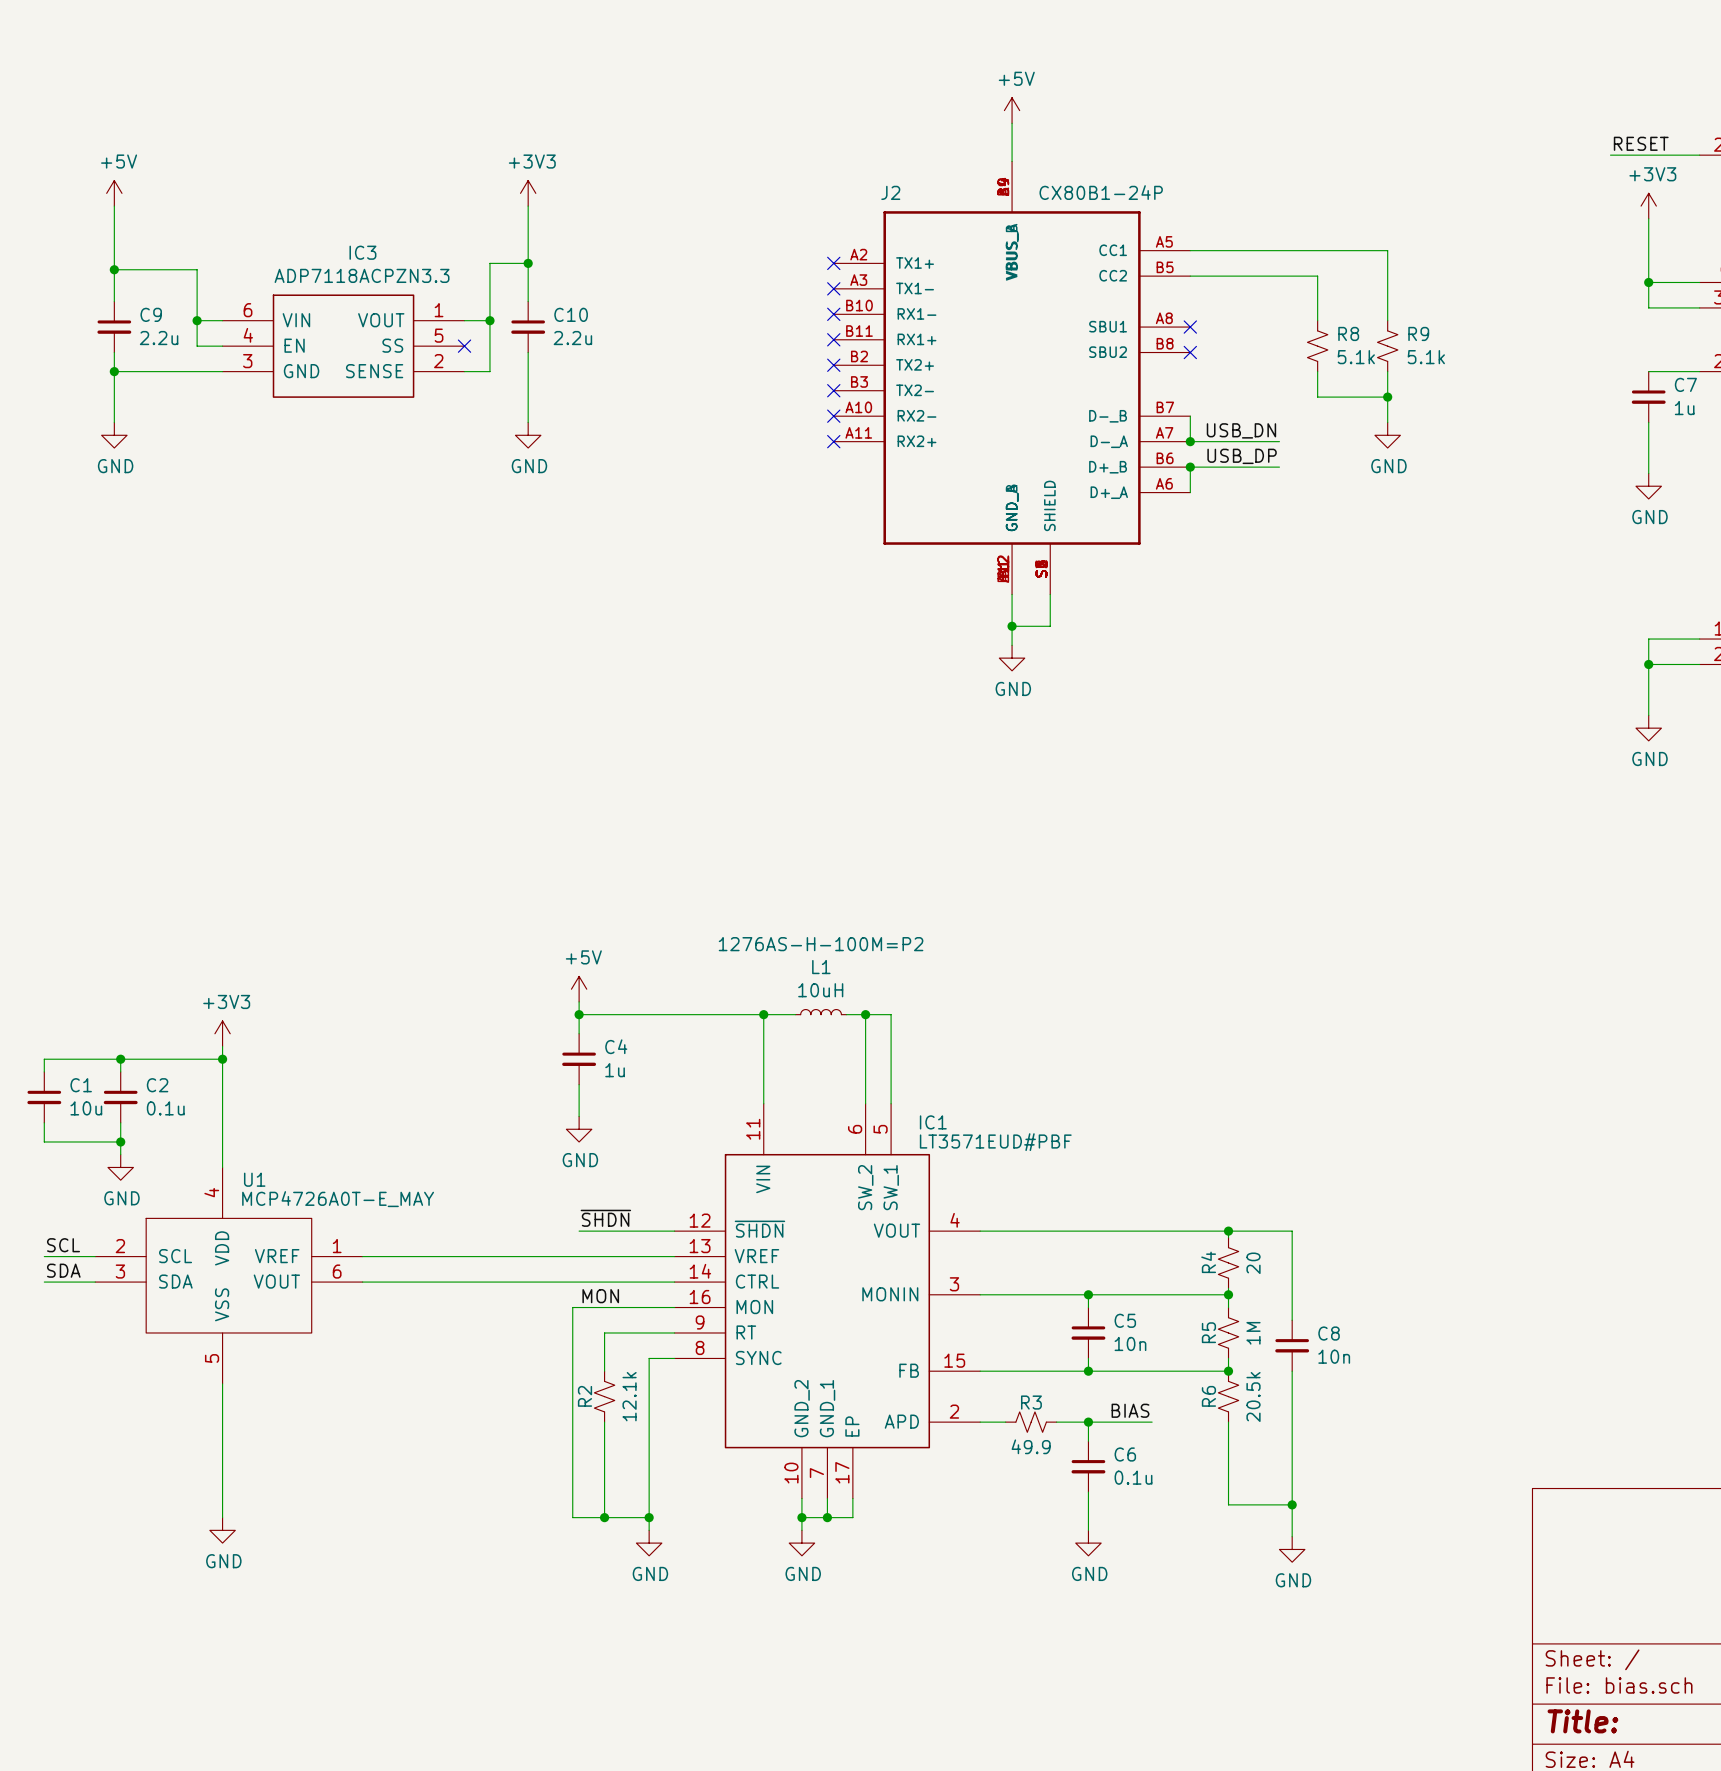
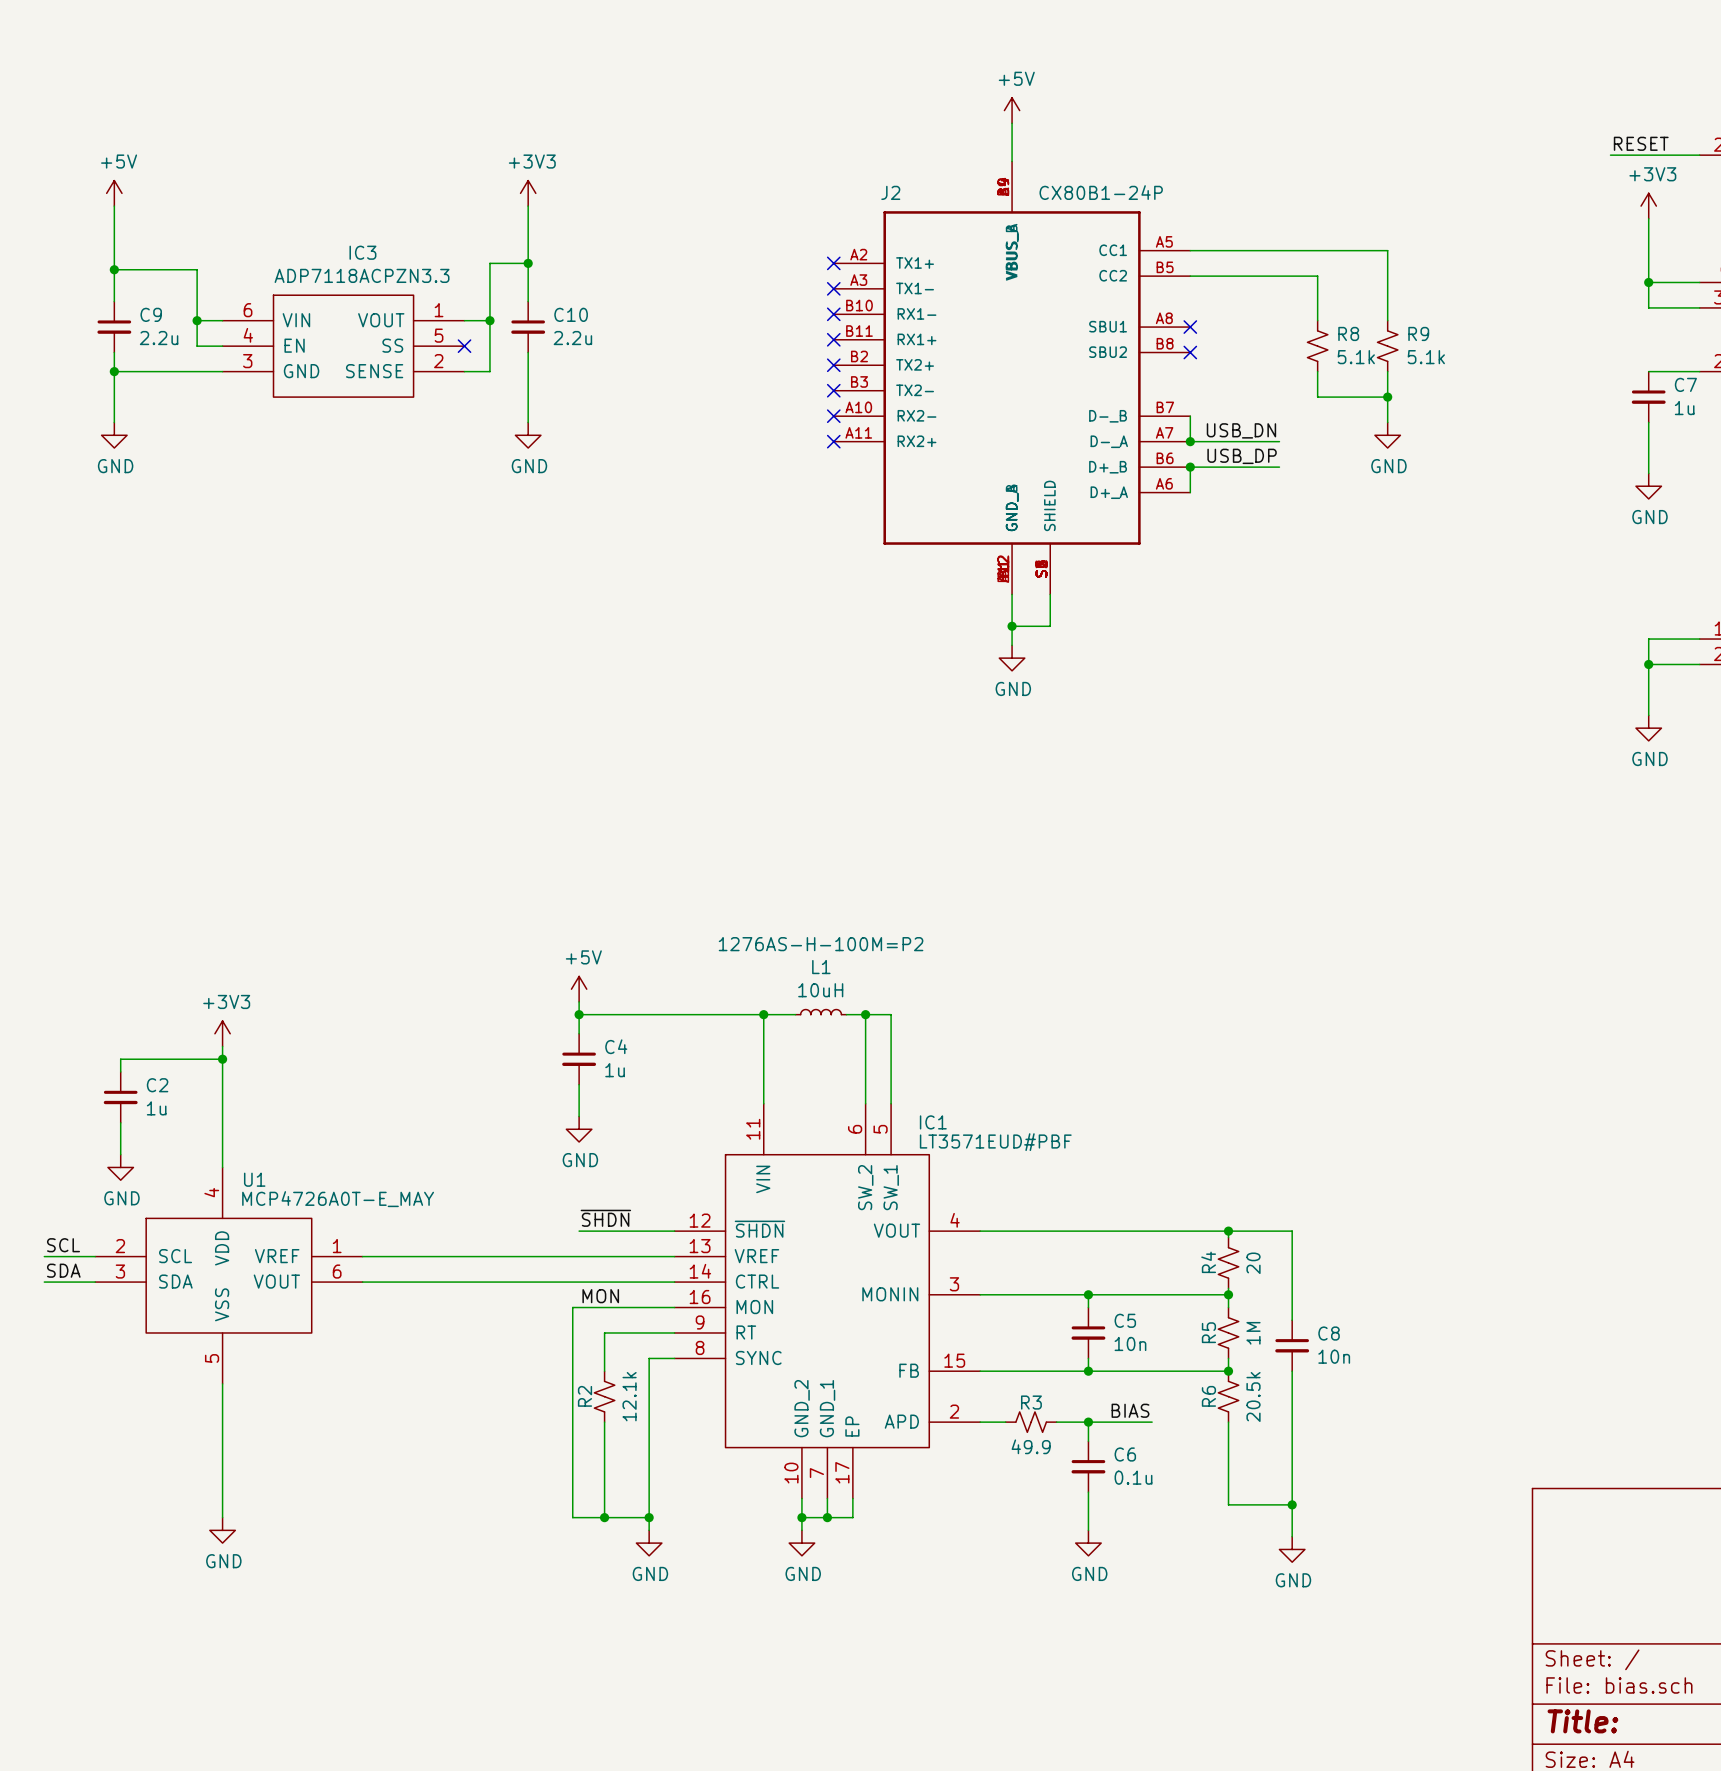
wire: (120, 1059) (44, 1059) (44, 1071) -> none
junction: (120, 1059) -> none
C1: 10u (44, 1097) -> none
C2 value: 0.1u (165, 1108) -> 1u (156, 1108)
wire: (44, 1122) (44, 1141) (120, 1141) -> none
junction: (120, 1141) -> none

